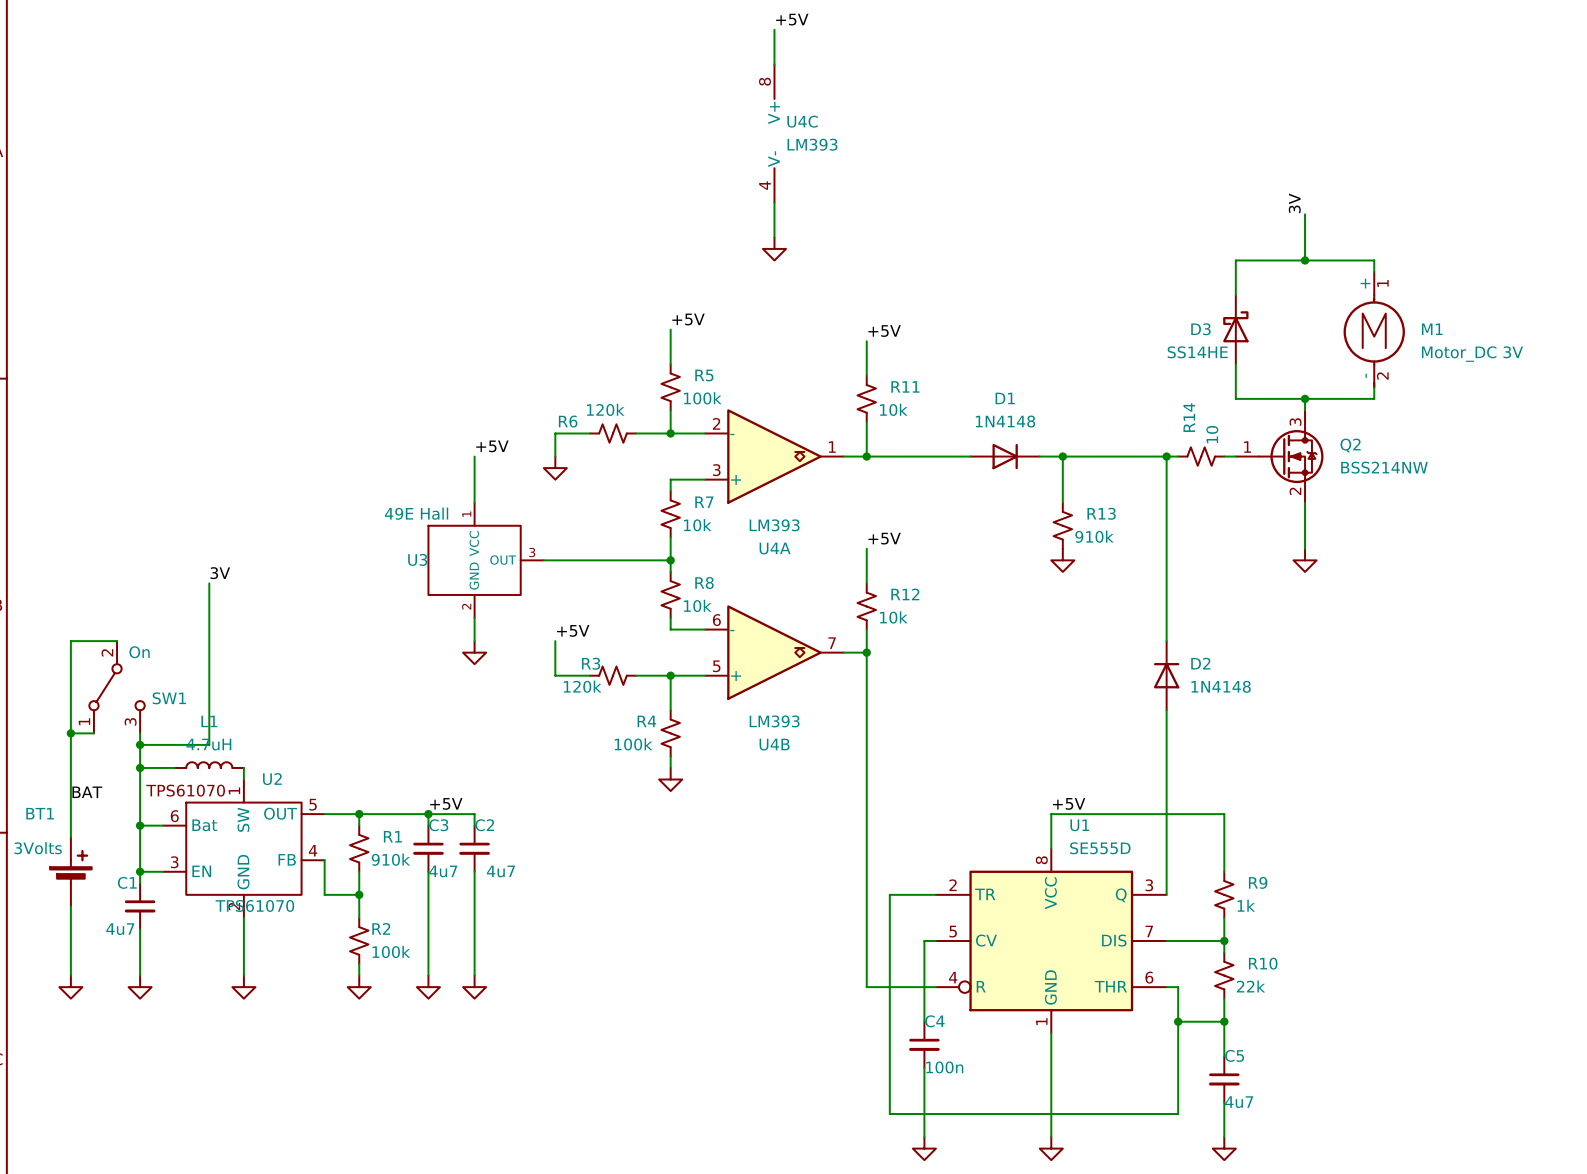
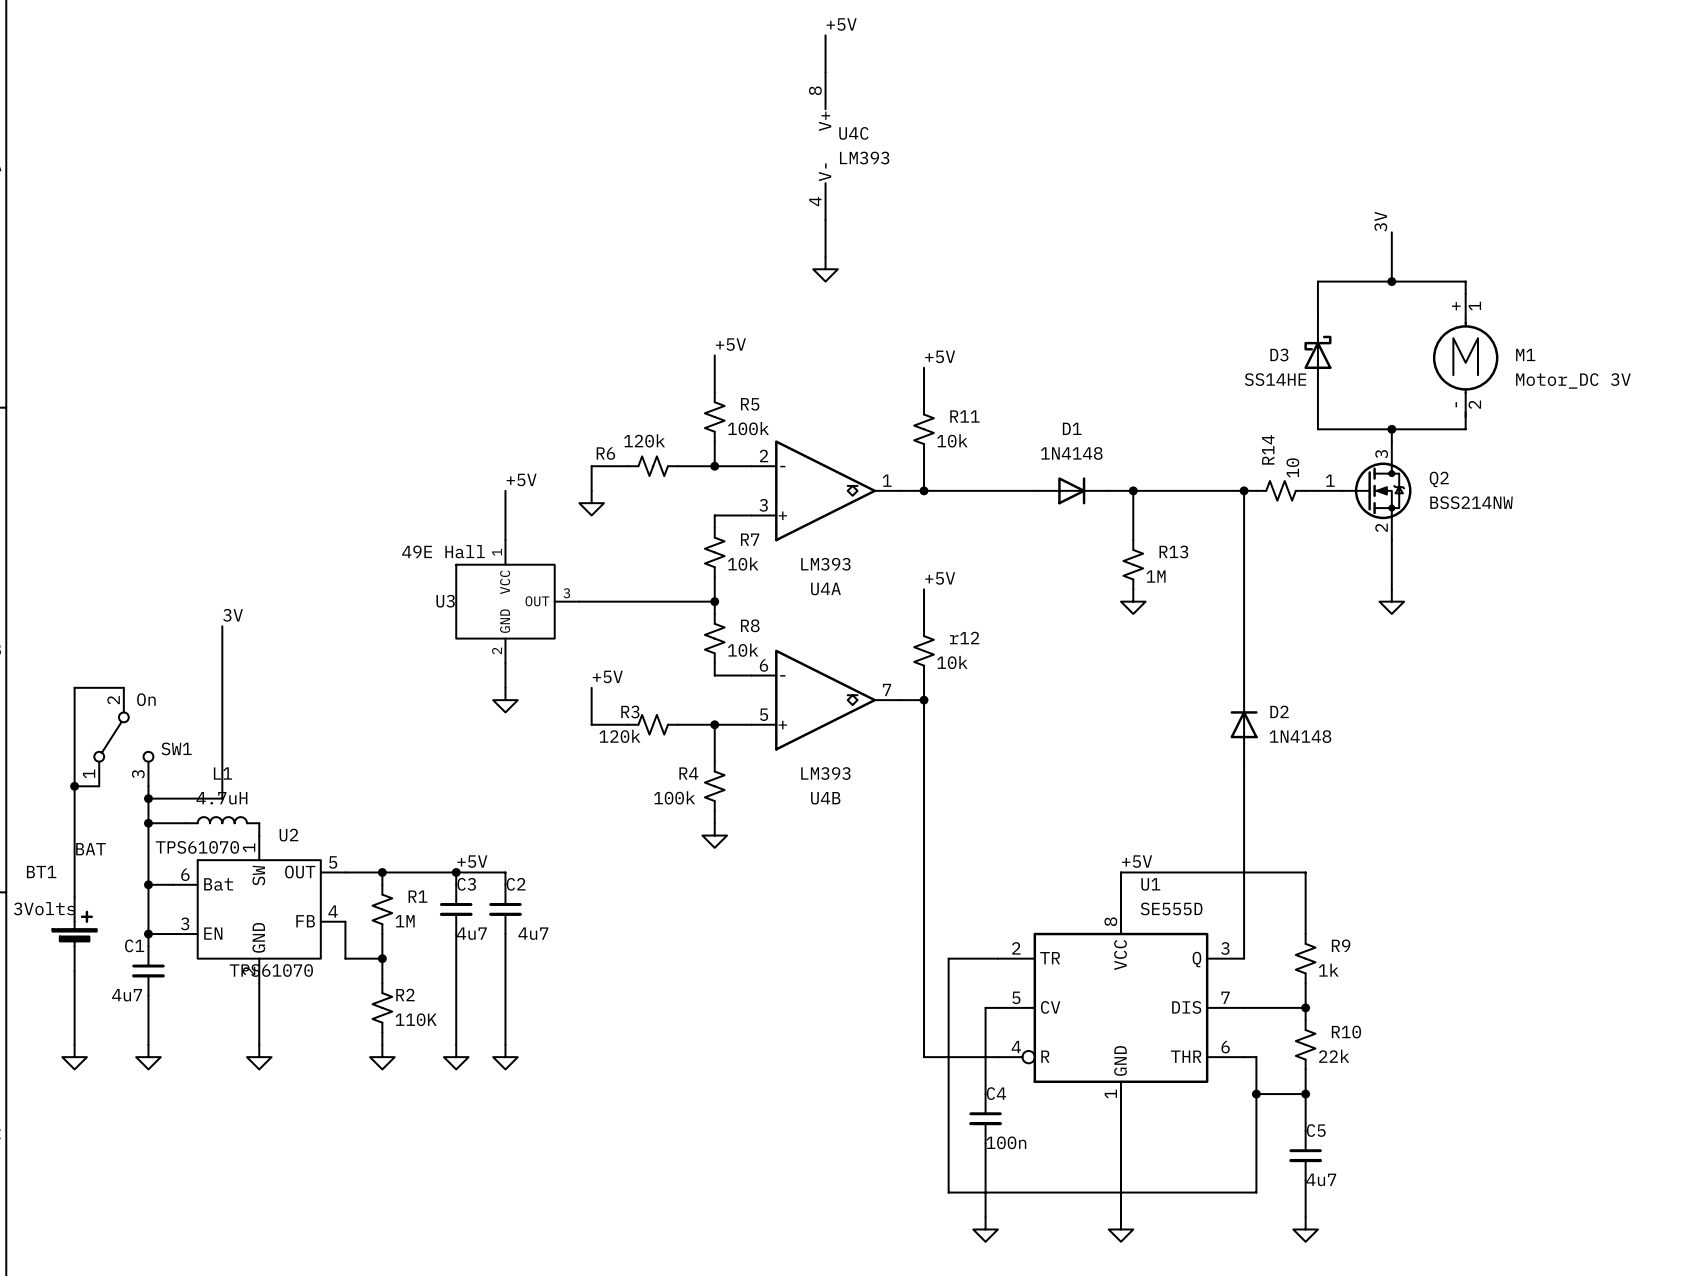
R13 value: 910k (1094, 536) -> 1M (1156, 576)
R12 name: R12 (905, 594) -> r12 (964, 638)
R1 value: 910k (390, 859) -> 1M (405, 921)
R2 value: 100k (391, 951) -> 110K (416, 1019)

